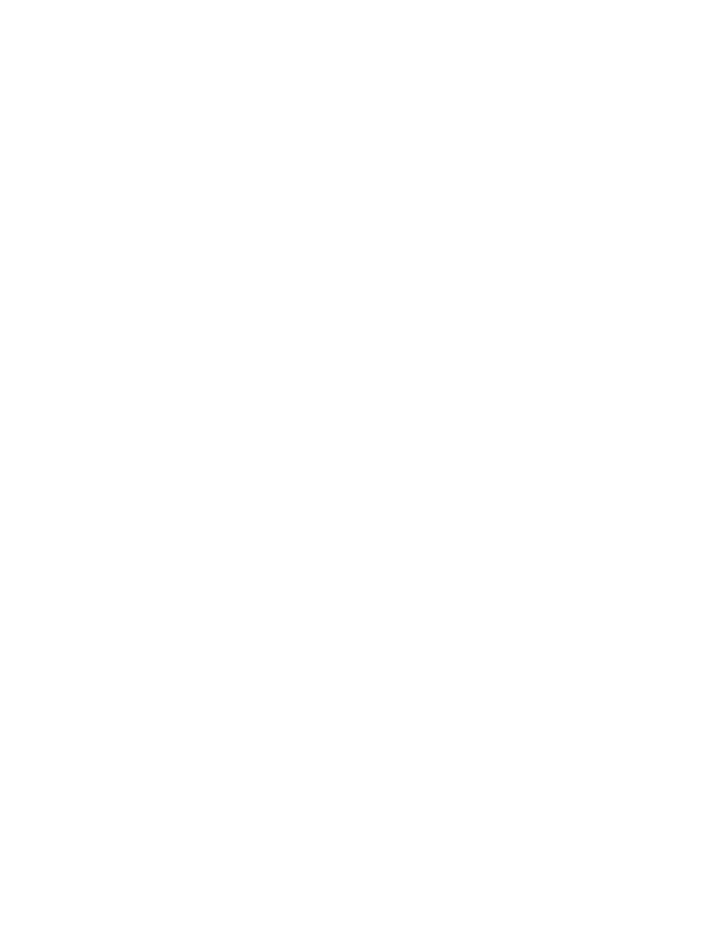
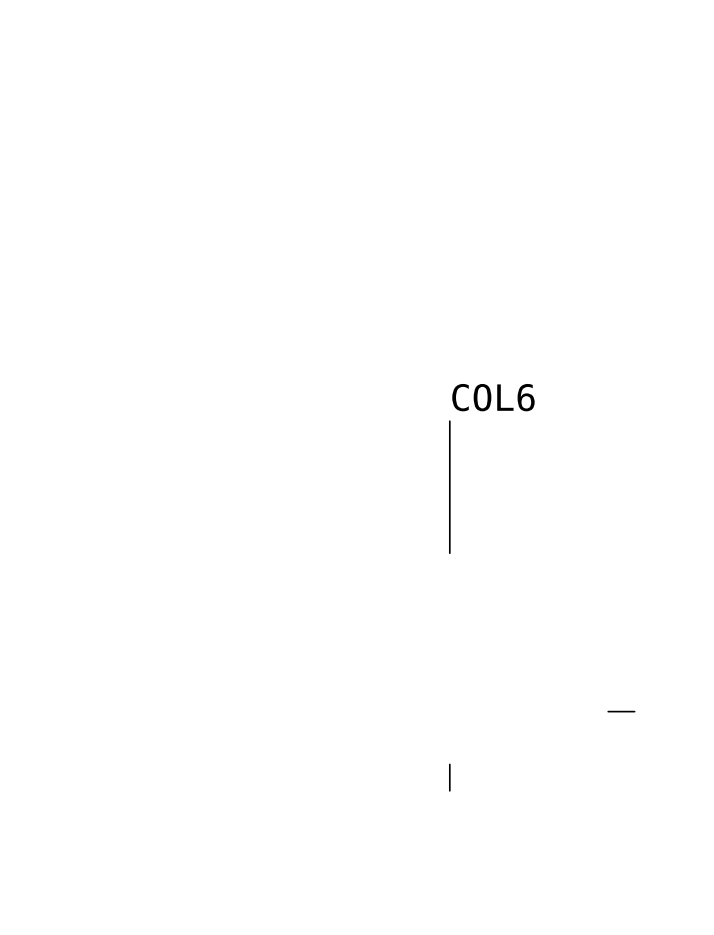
label: none -> COL6 (493, 397)
wire: none -> (449, 421) (449, 553)
wire: none -> (608, 711) (634, 711)
wire: none -> (449, 764) (449, 790)

